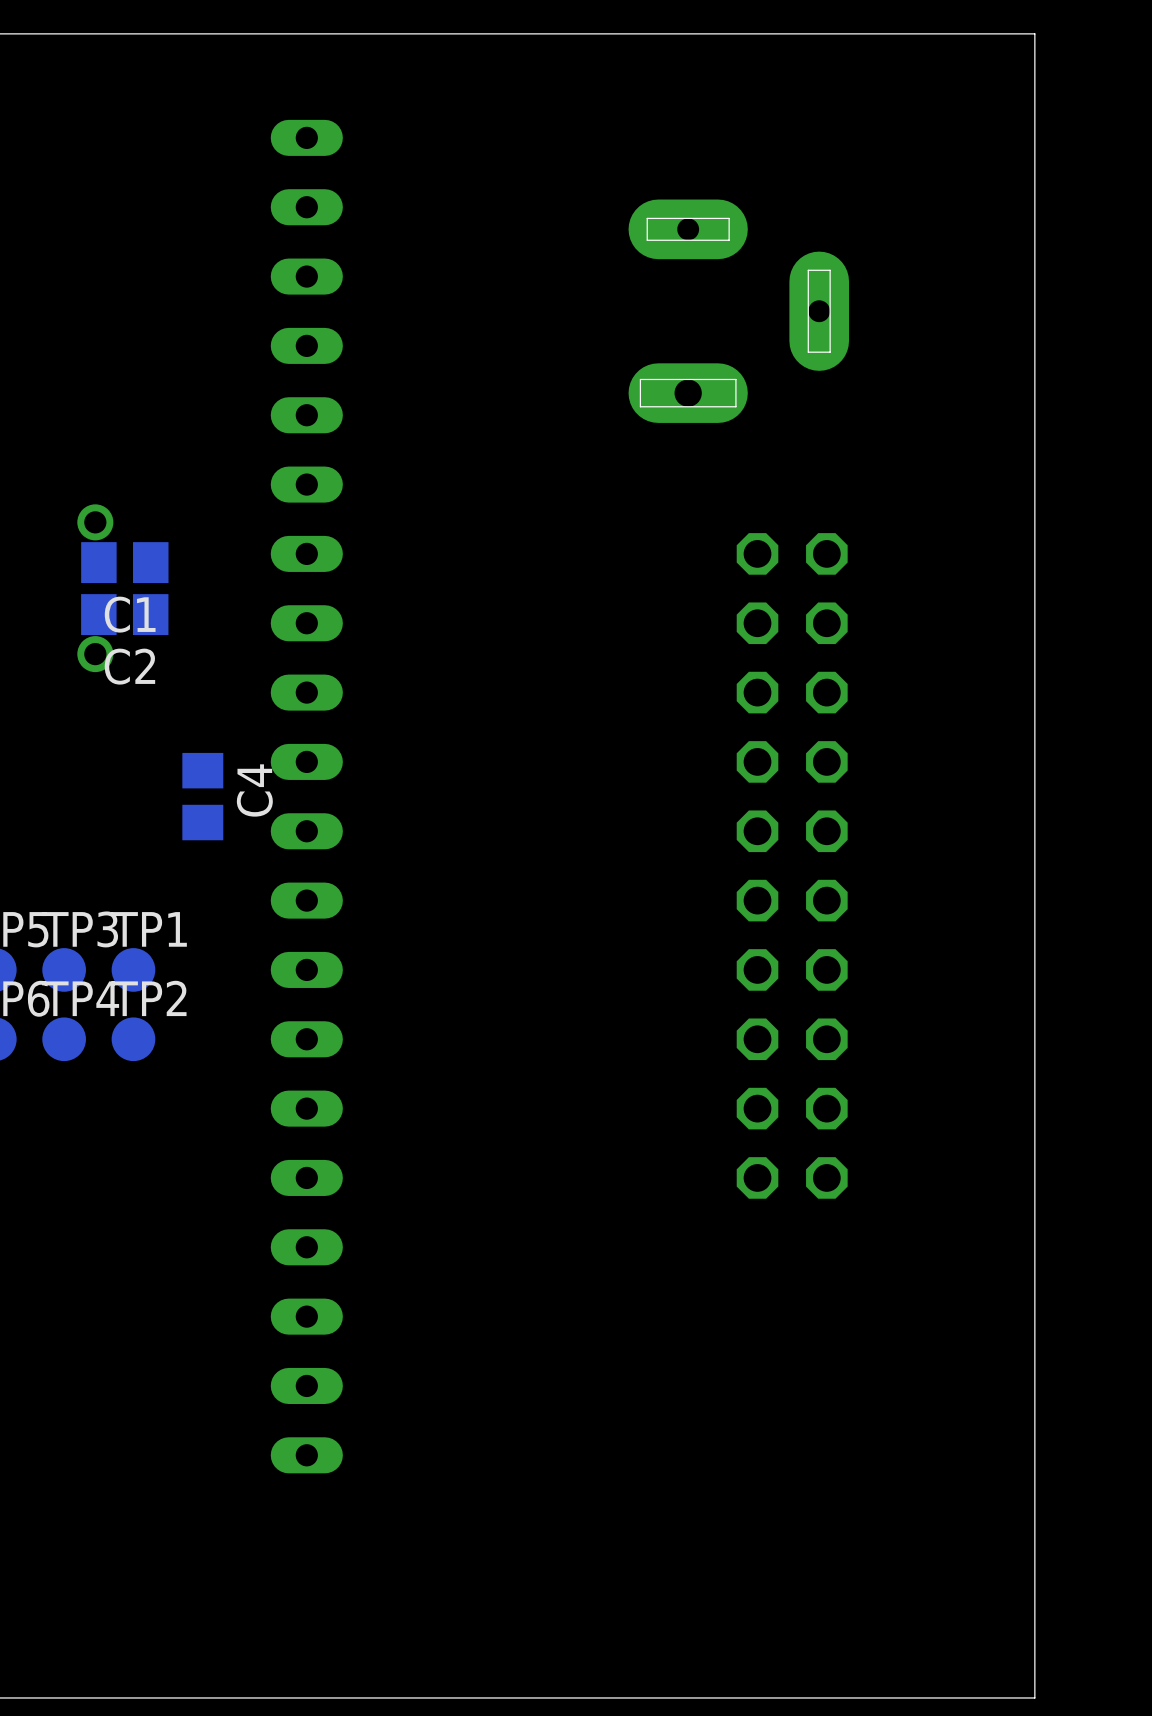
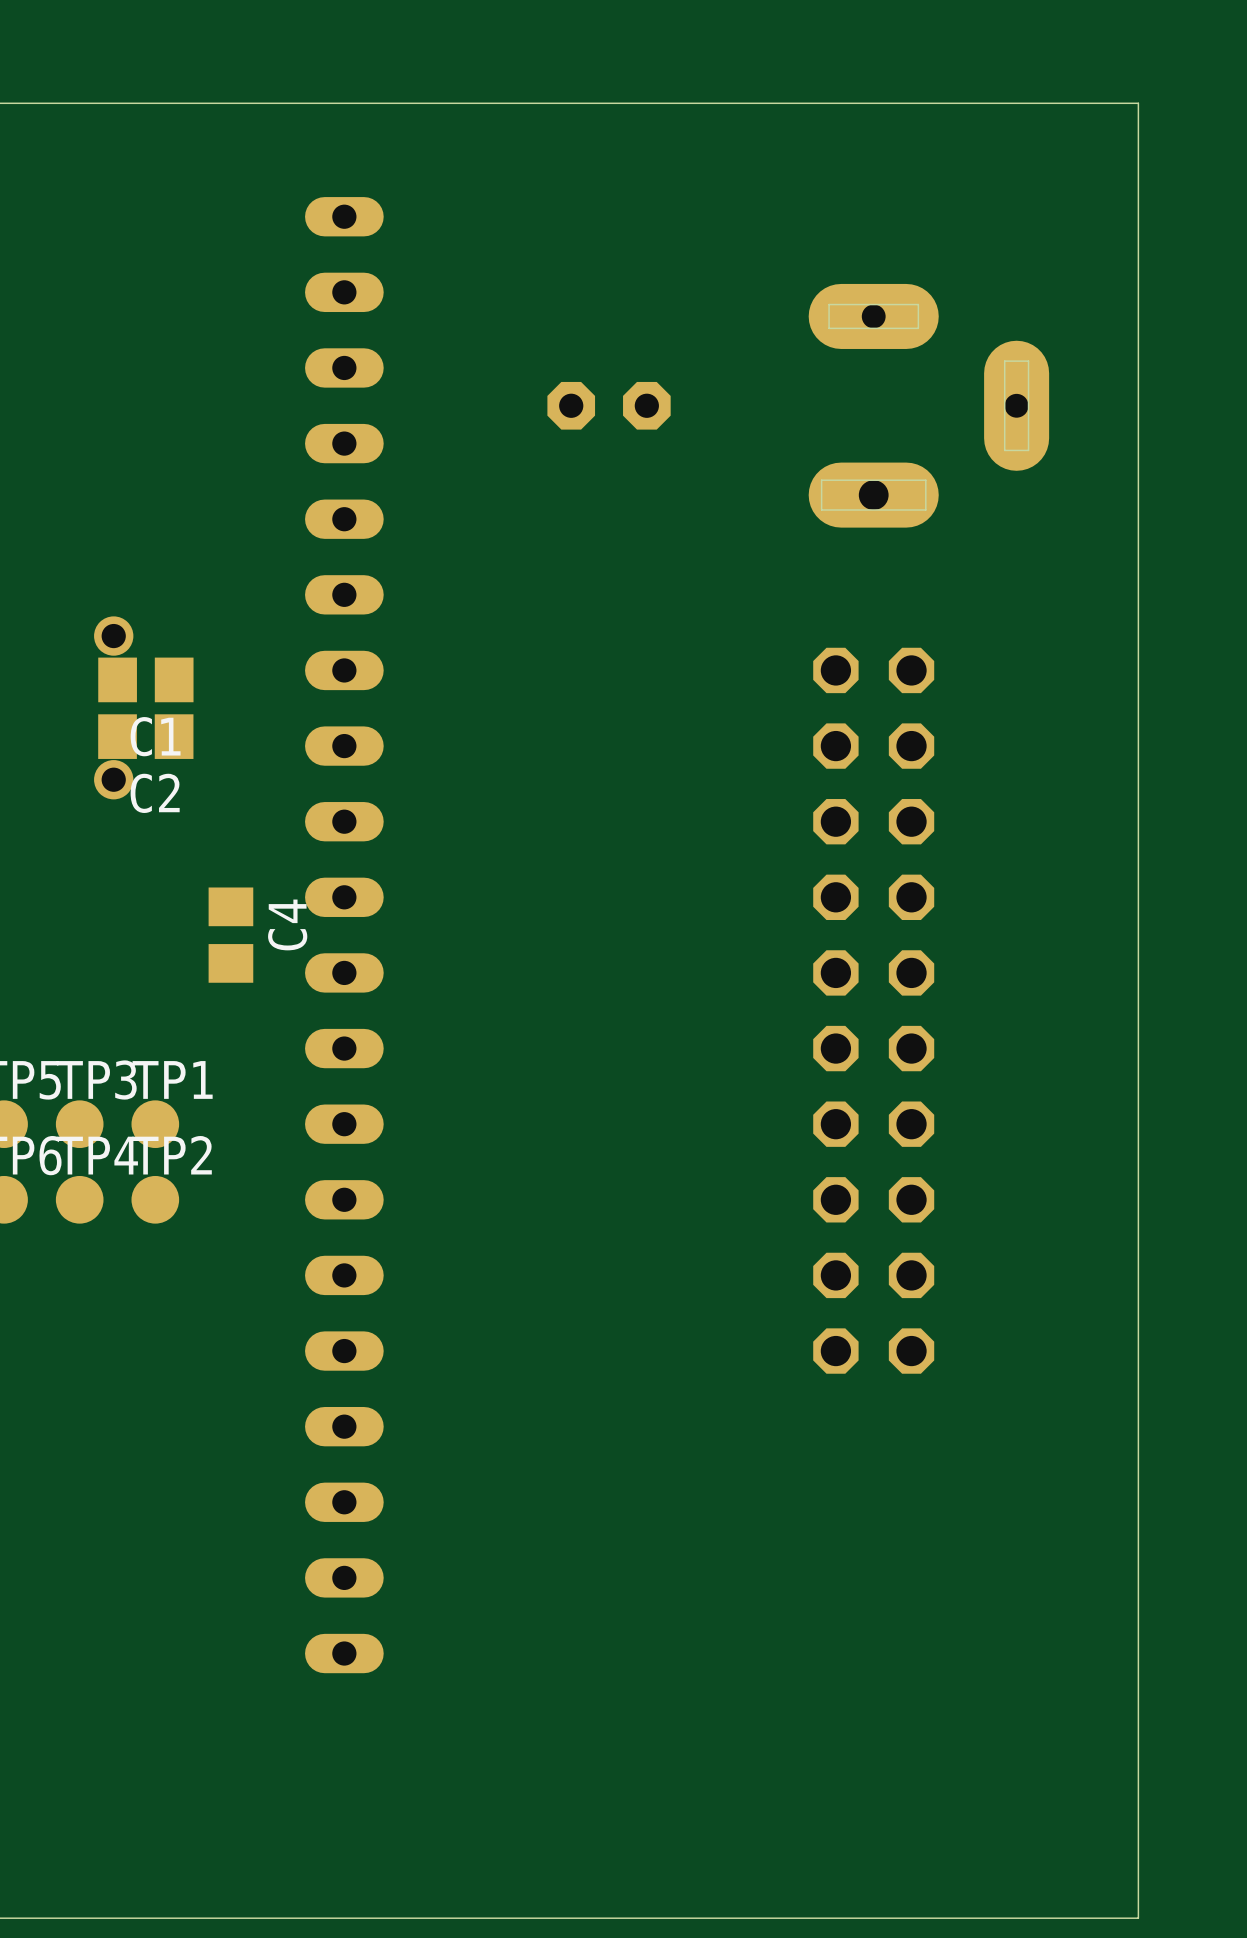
part: none -> (571, 405)
part: none -> (646, 405)
part position: (738, 311) -> (928, 405)

